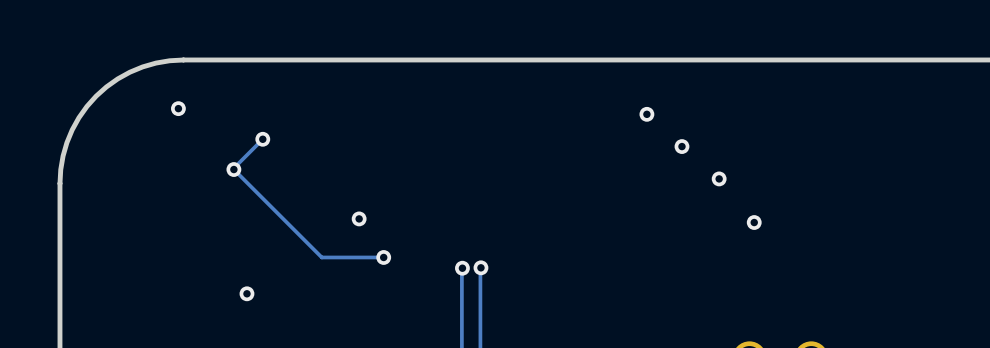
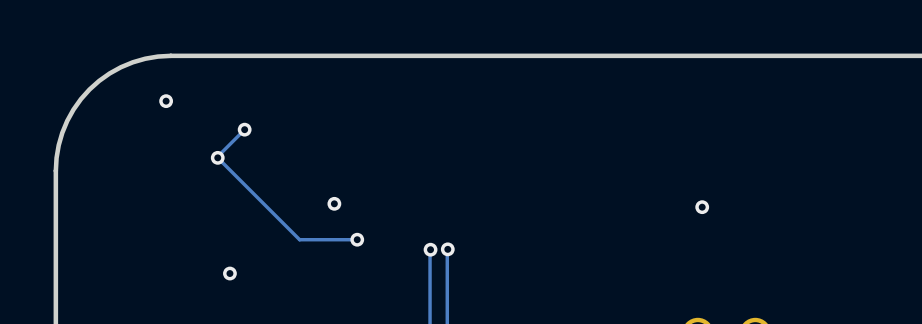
via: (646, 114) -> none
via: (681, 146) -> none
via: (719, 178) -> none

